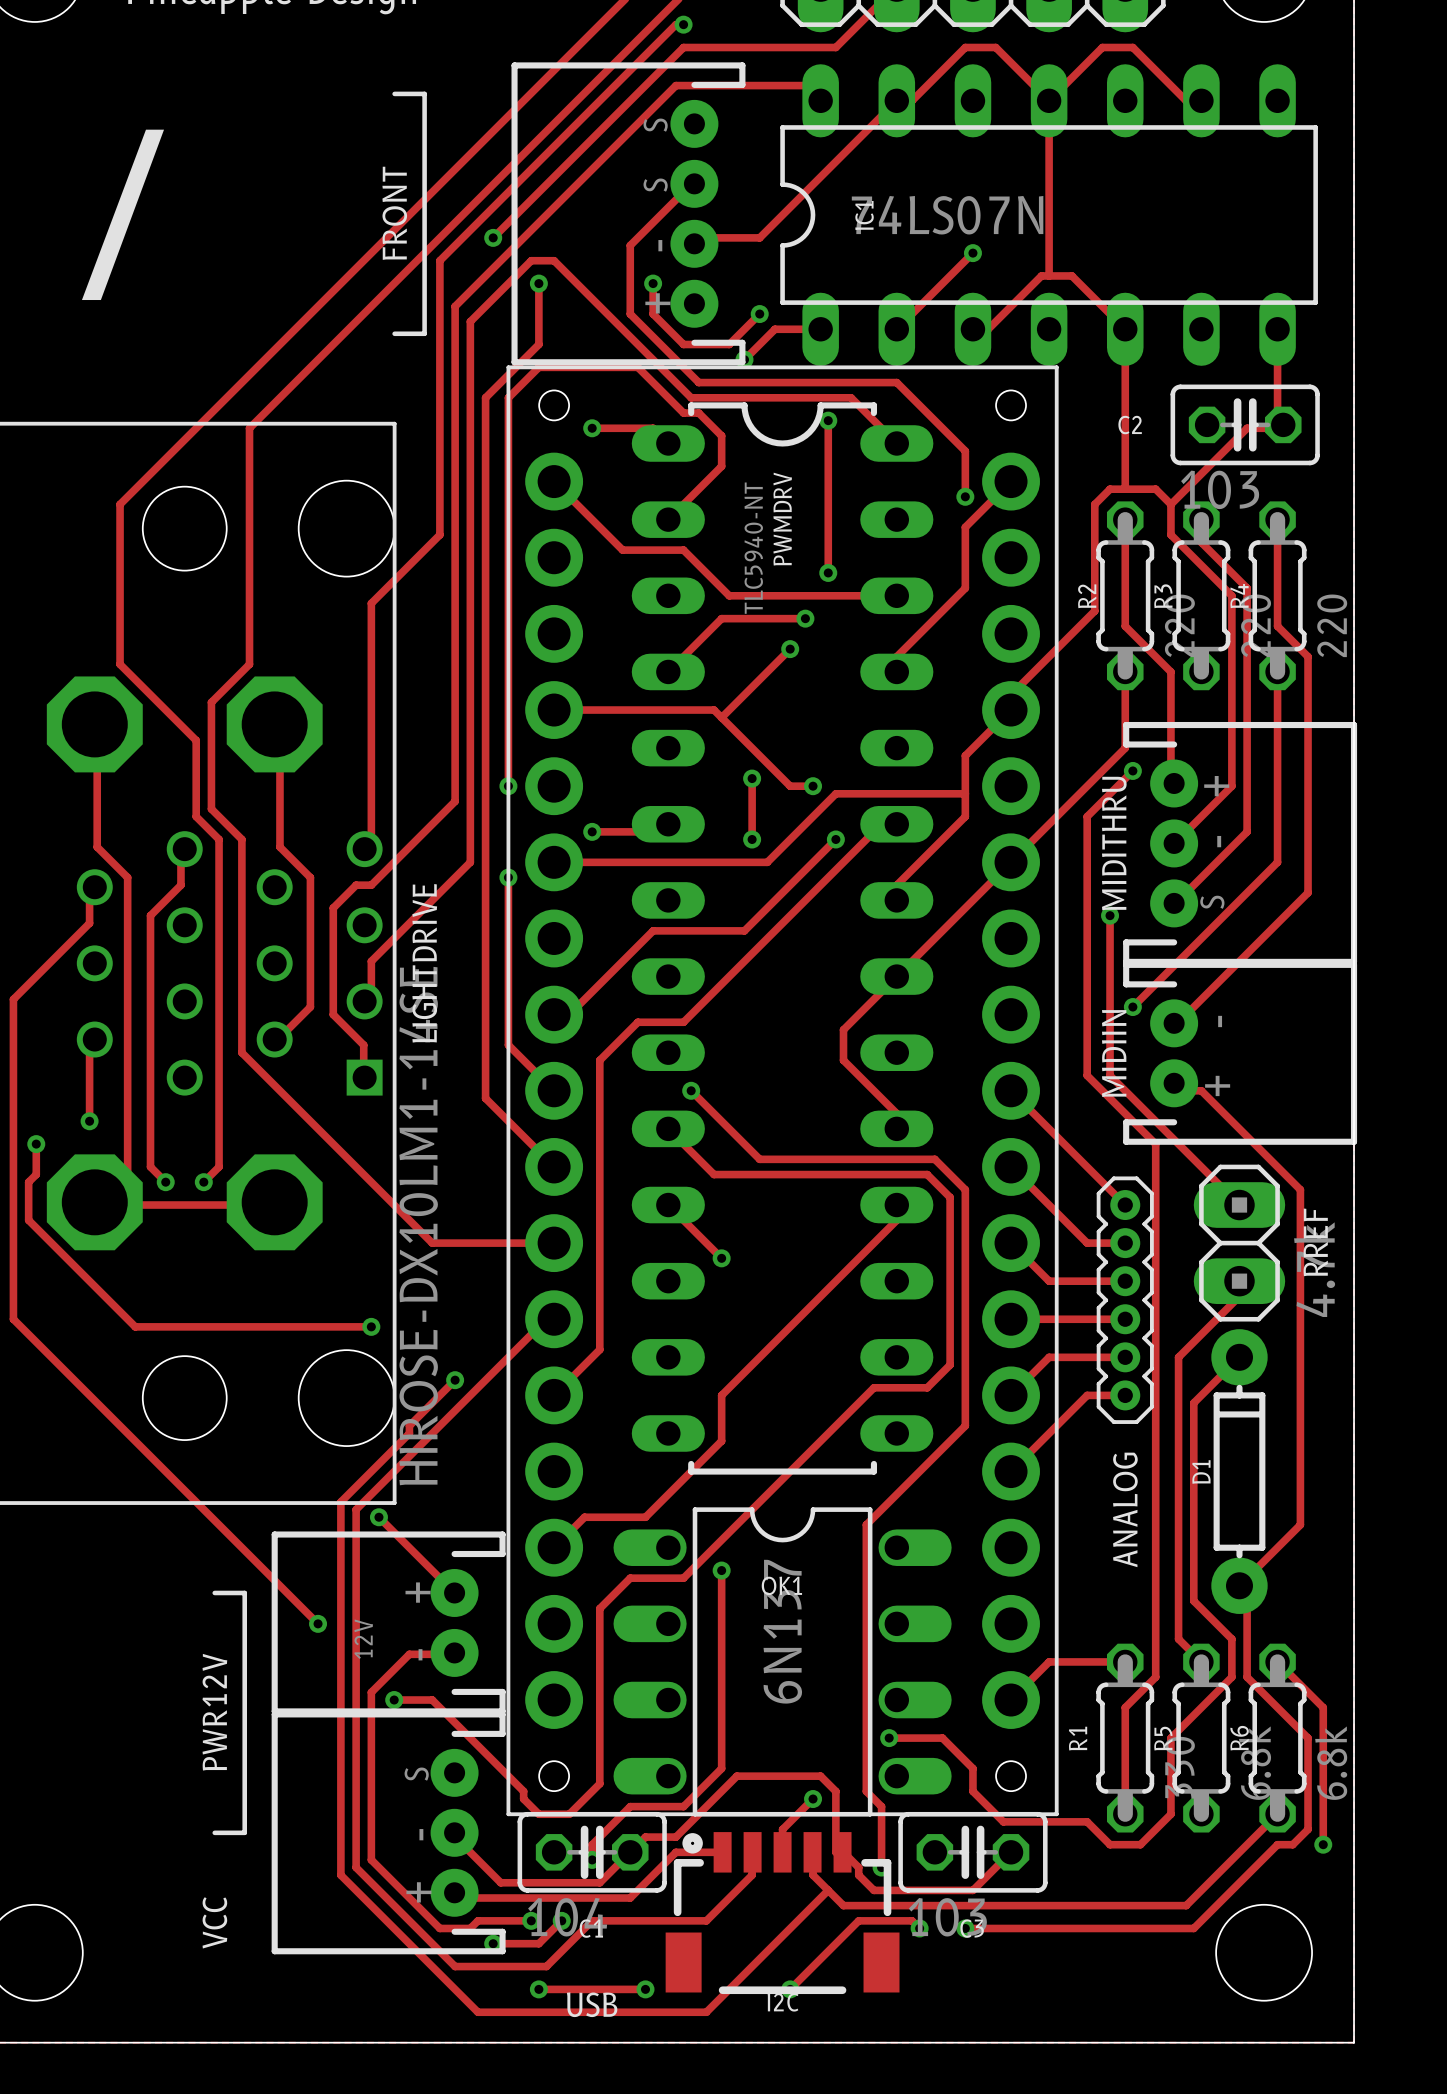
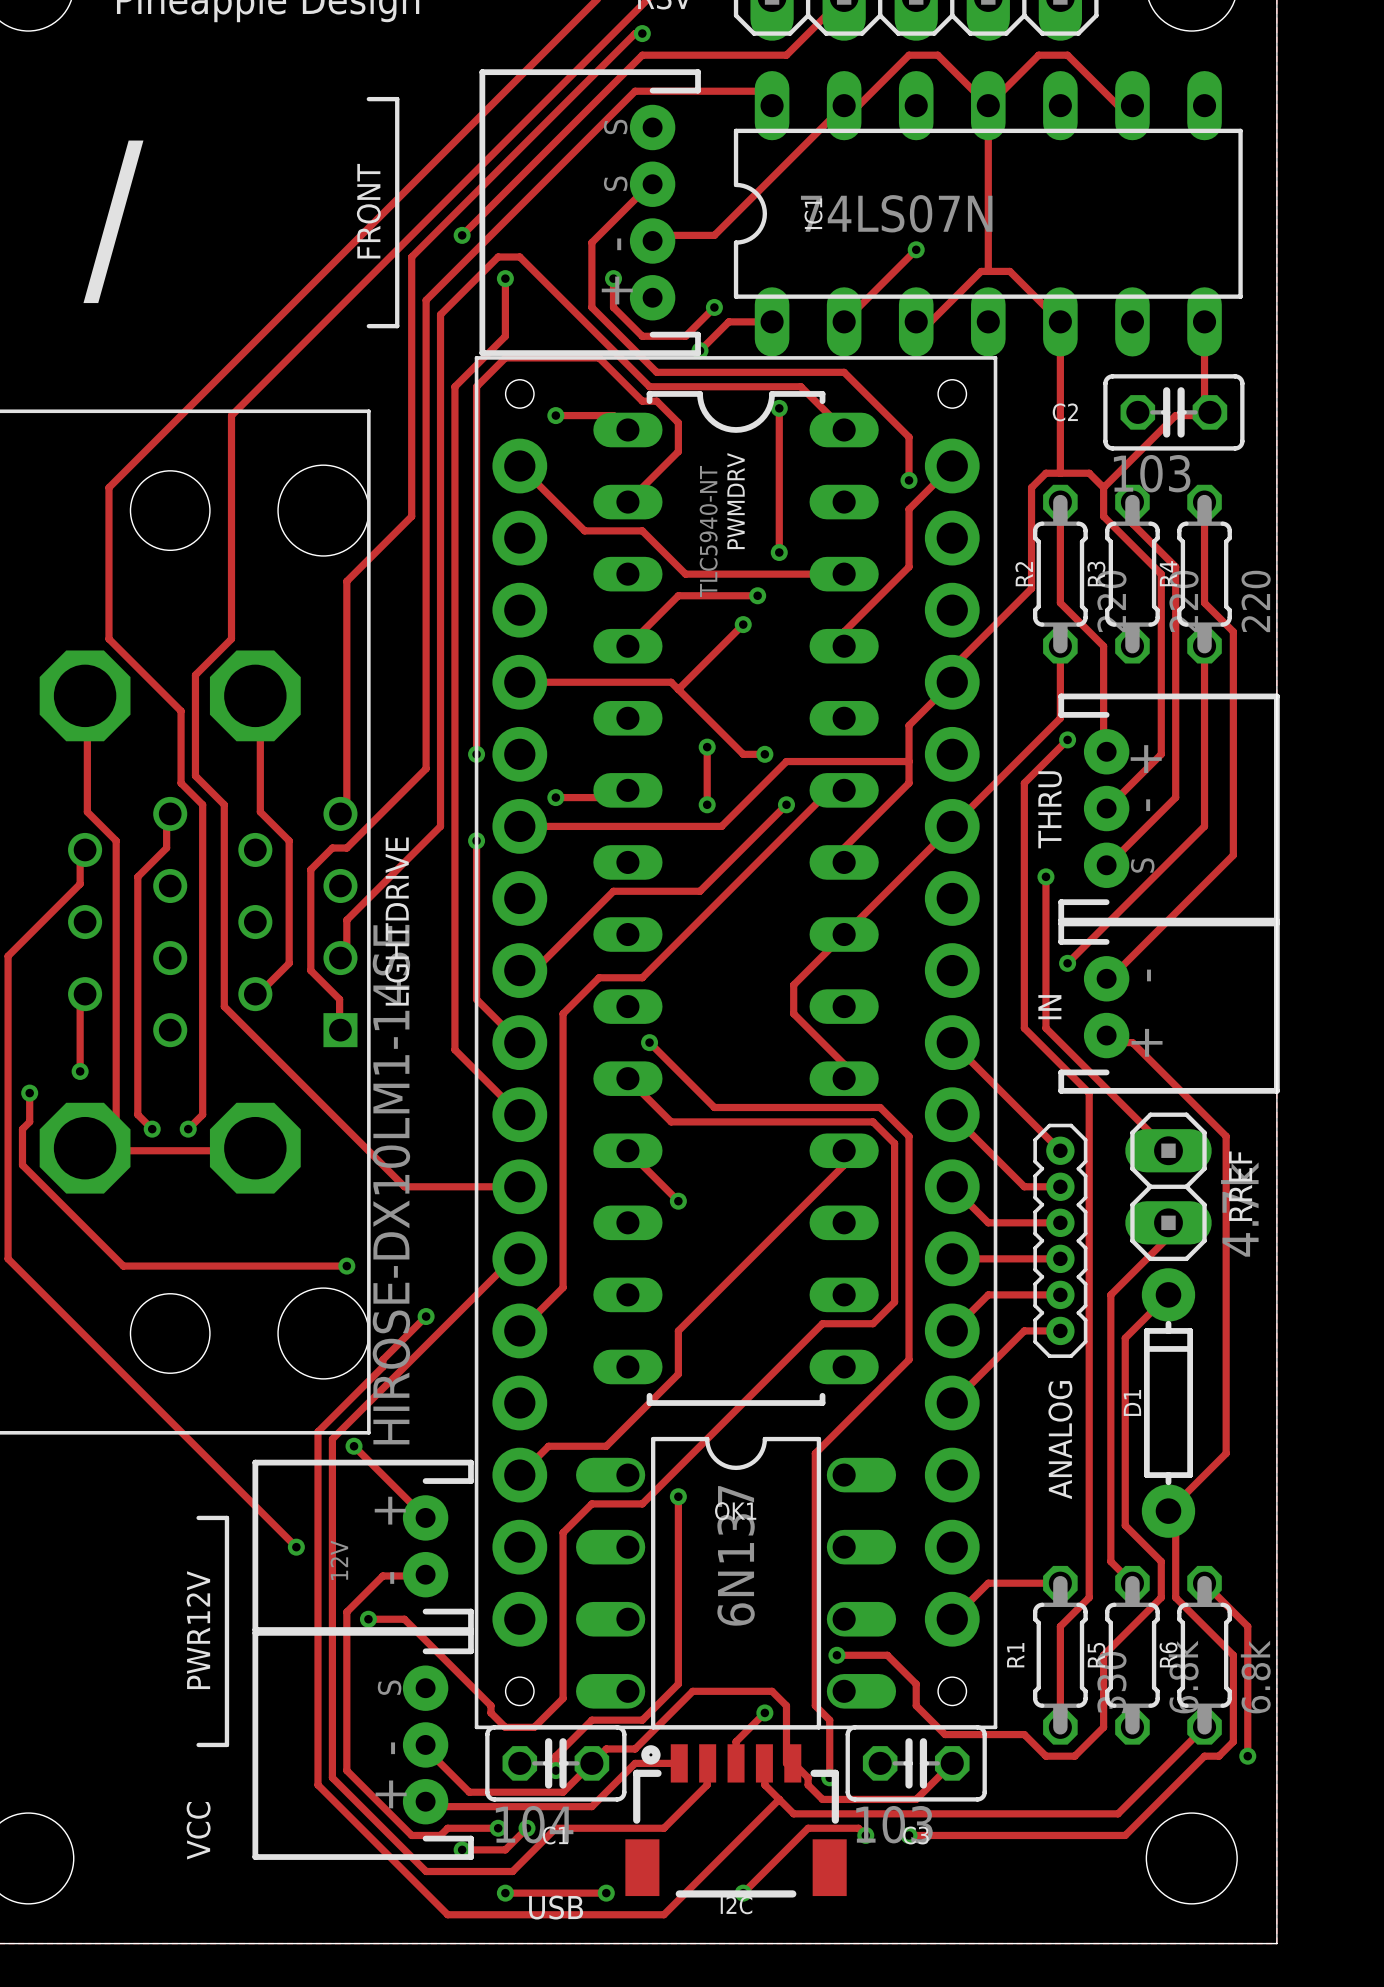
MIDITHRU name: MIDITHRU (1114, 843) -> THRU (1050, 809)
MIDIIN name: MIDIIN (1114, 1053) -> IN (1049, 1007)

